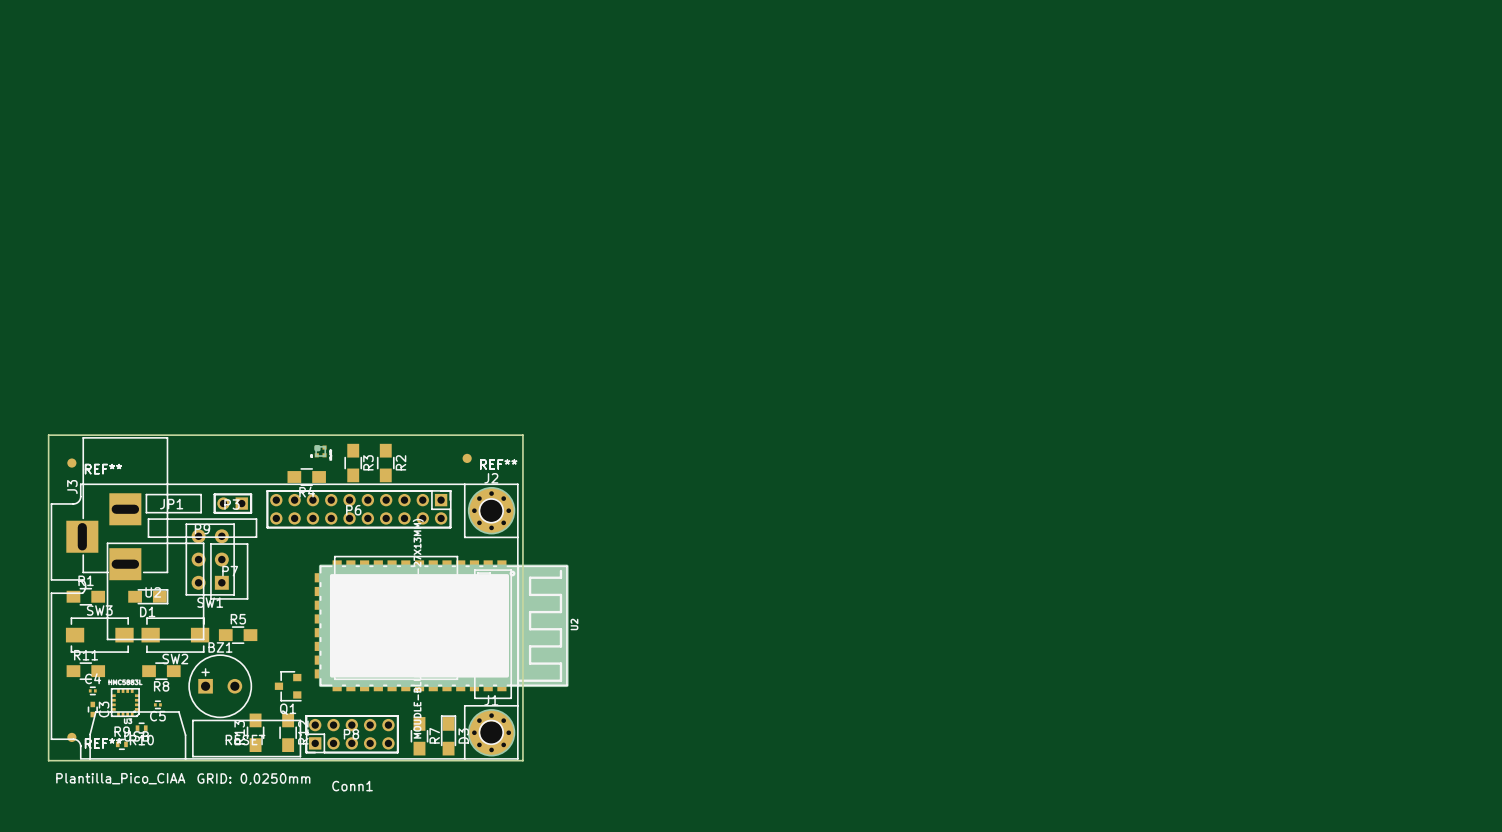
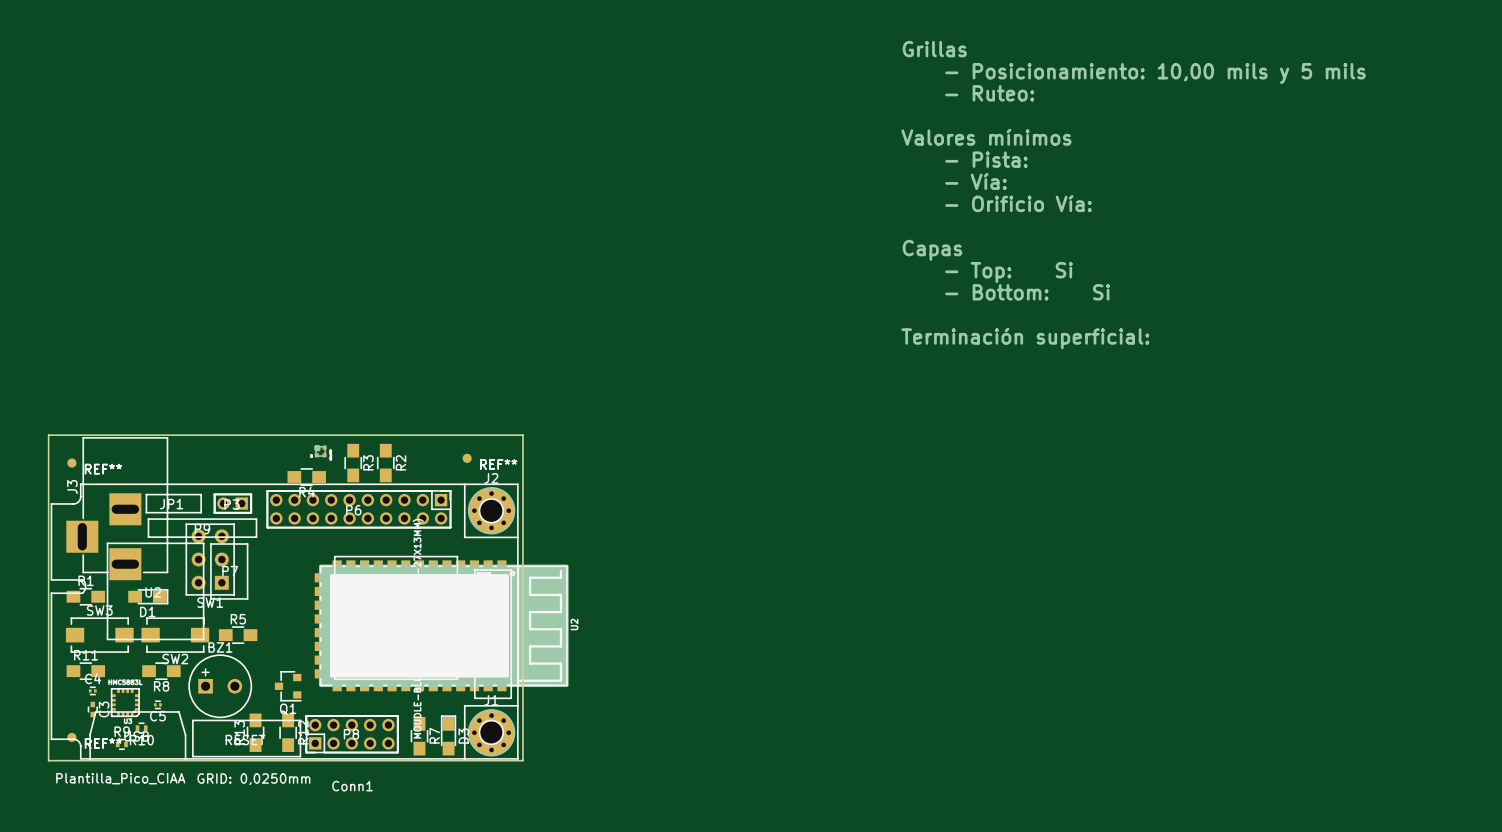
text: none -> Grillas (934, 49)
text: none -> - Posicionamiento: 10,00 mils y 5 mils (1155, 73)
text: none -> - Ruteo: (989, 93)
text: none -> Valores mínimos (986, 137)
text: none -> - Pista: (986, 159)
text: none -> - Vía: (975, 181)
text: none -> - Orificio Vía: (1018, 203)
text: none -> Capas (932, 250)
text: none -> - Top: Si (1009, 272)
text: none -> - Bottom: Si (1027, 292)
text: none -> Terminación superficial: (1025, 338)

